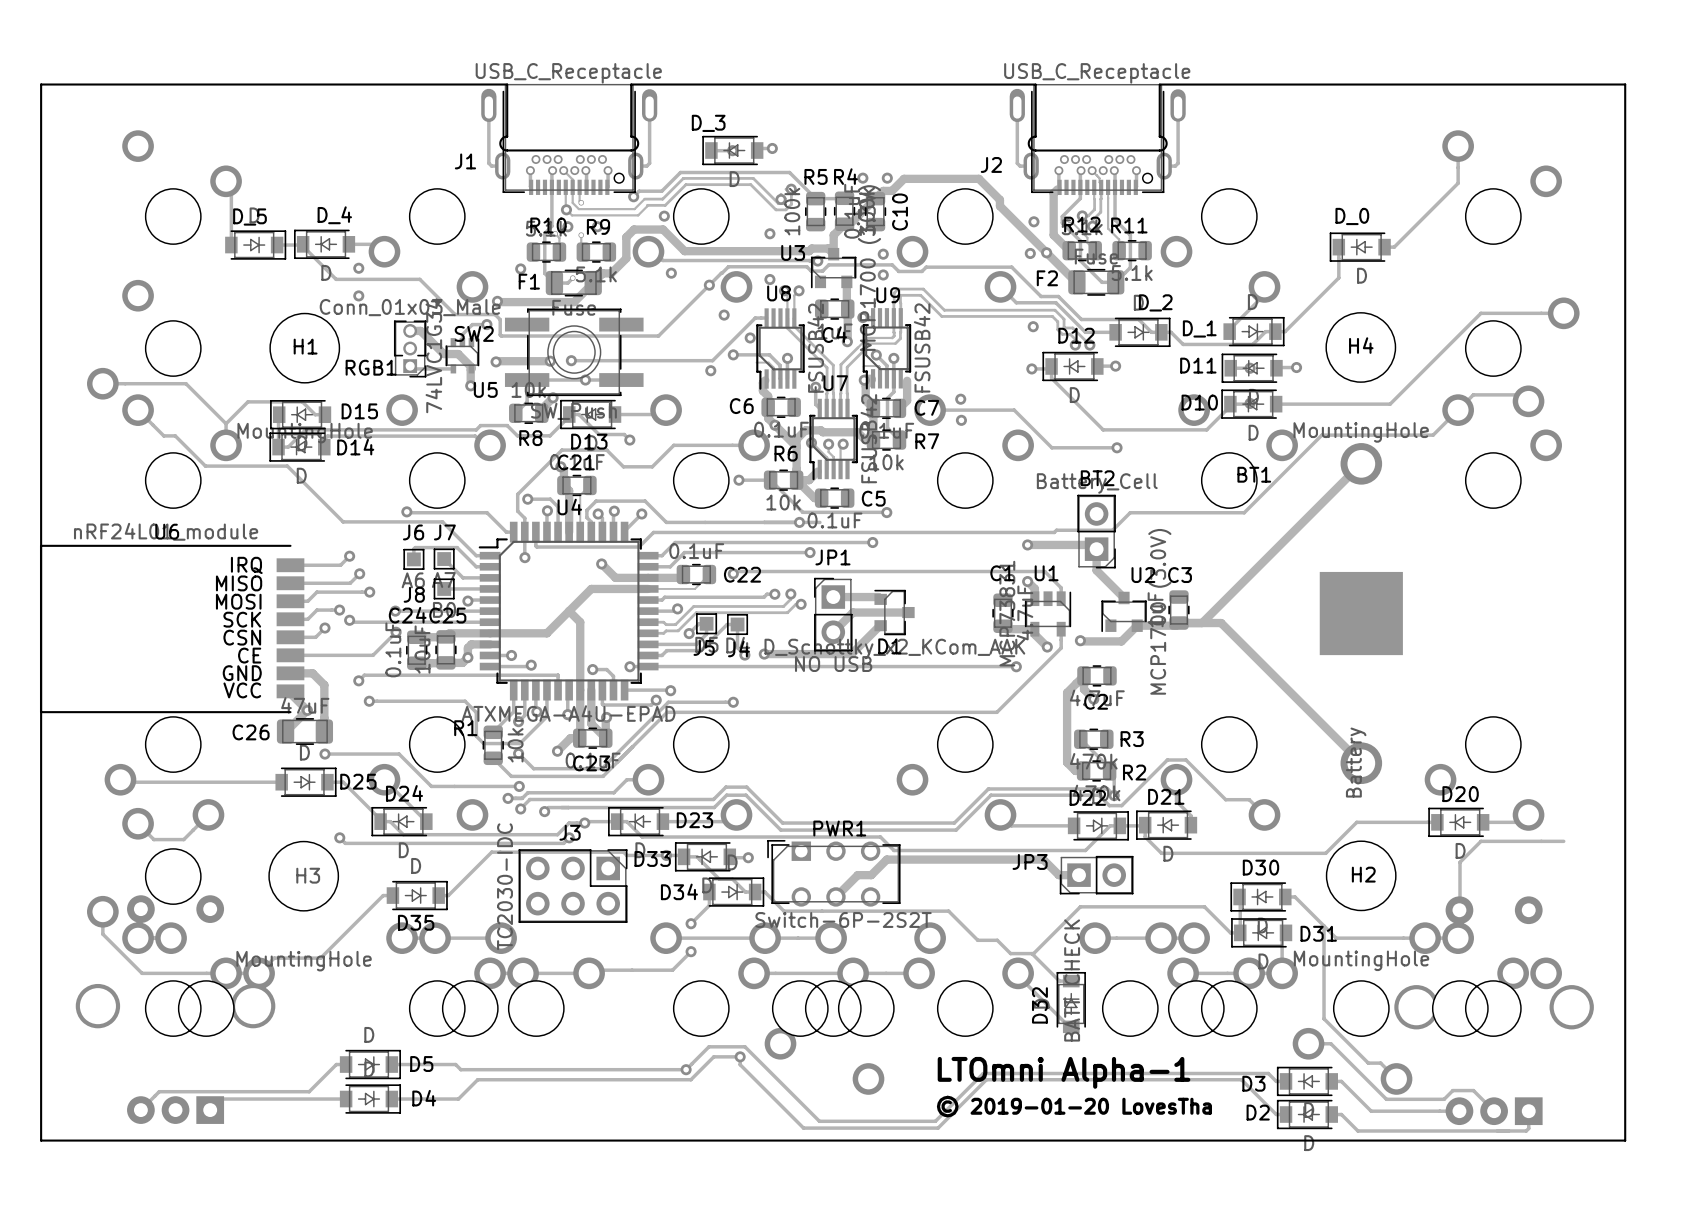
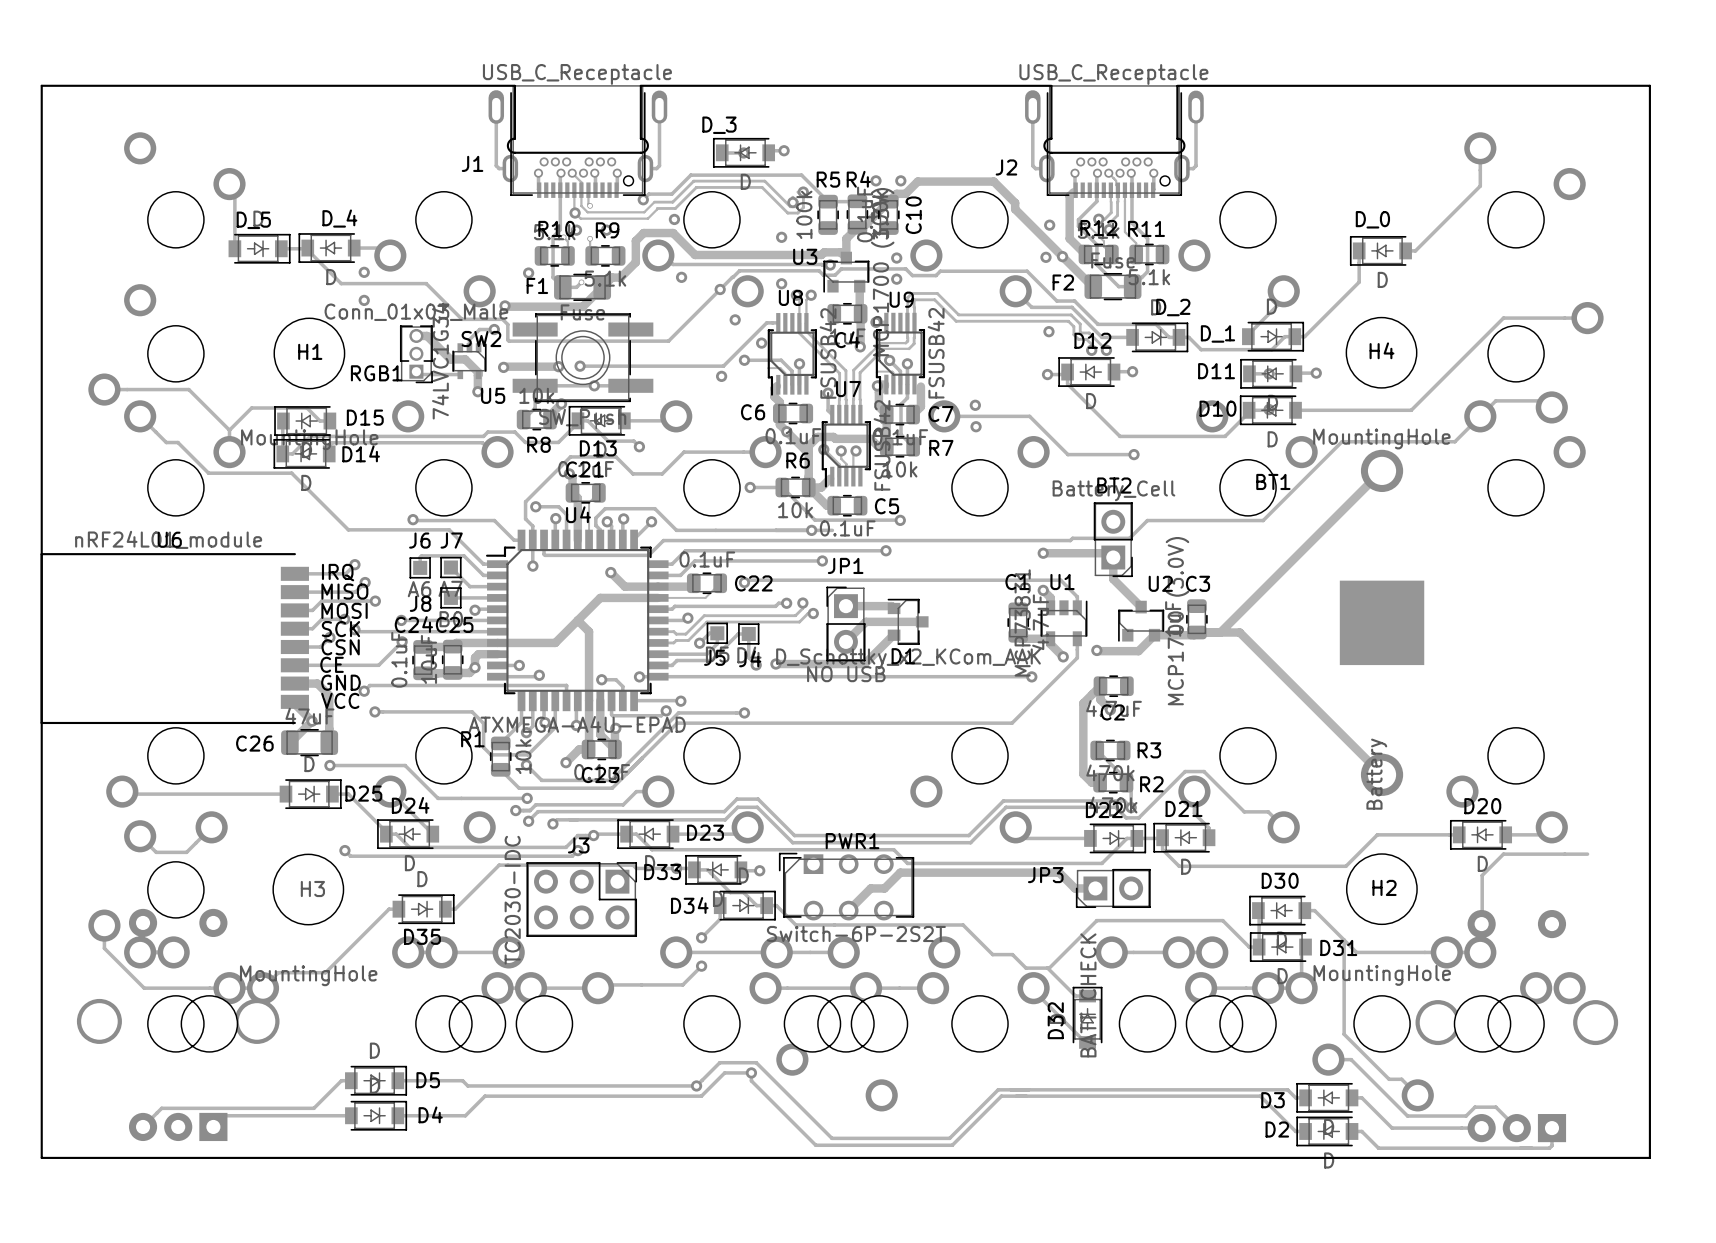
U6 text position: IRQ (246, 565) -> IRQ (338, 572)
U6 text position: MISO (239, 583) -> MISO (344, 591)
U6 text position: MOSI (238, 601) -> MOSI (344, 610)
U6 text position: SCK (242, 619) -> SCK (340, 629)
U6 text position: CSN (242, 637) -> CSN (340, 647)
U6 text position: CE (249, 655) -> CE (332, 664)
U6 text position: GND (242, 673) -> GND (340, 682)
U6 text position: VCC (242, 690) -> VCC (340, 700)
text: LTOmni Alpha-1 (1064, 1072) -> none
text: © 2019-01-20 LovesTha (1074, 1106) -> none

